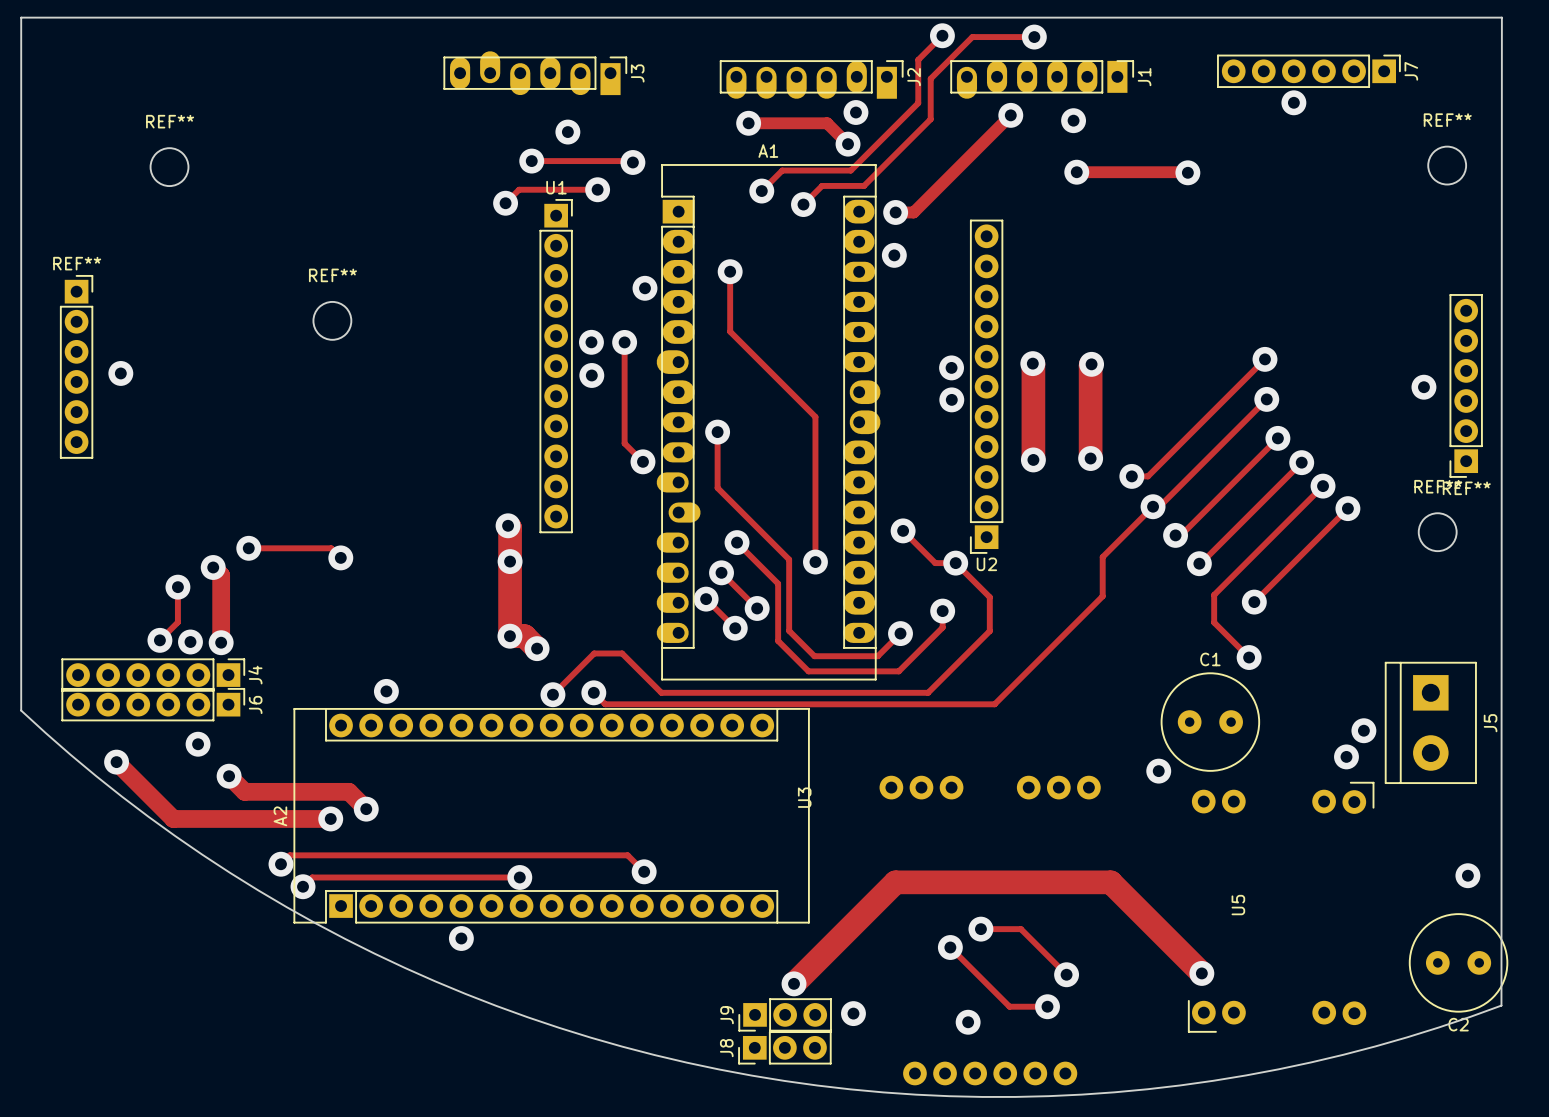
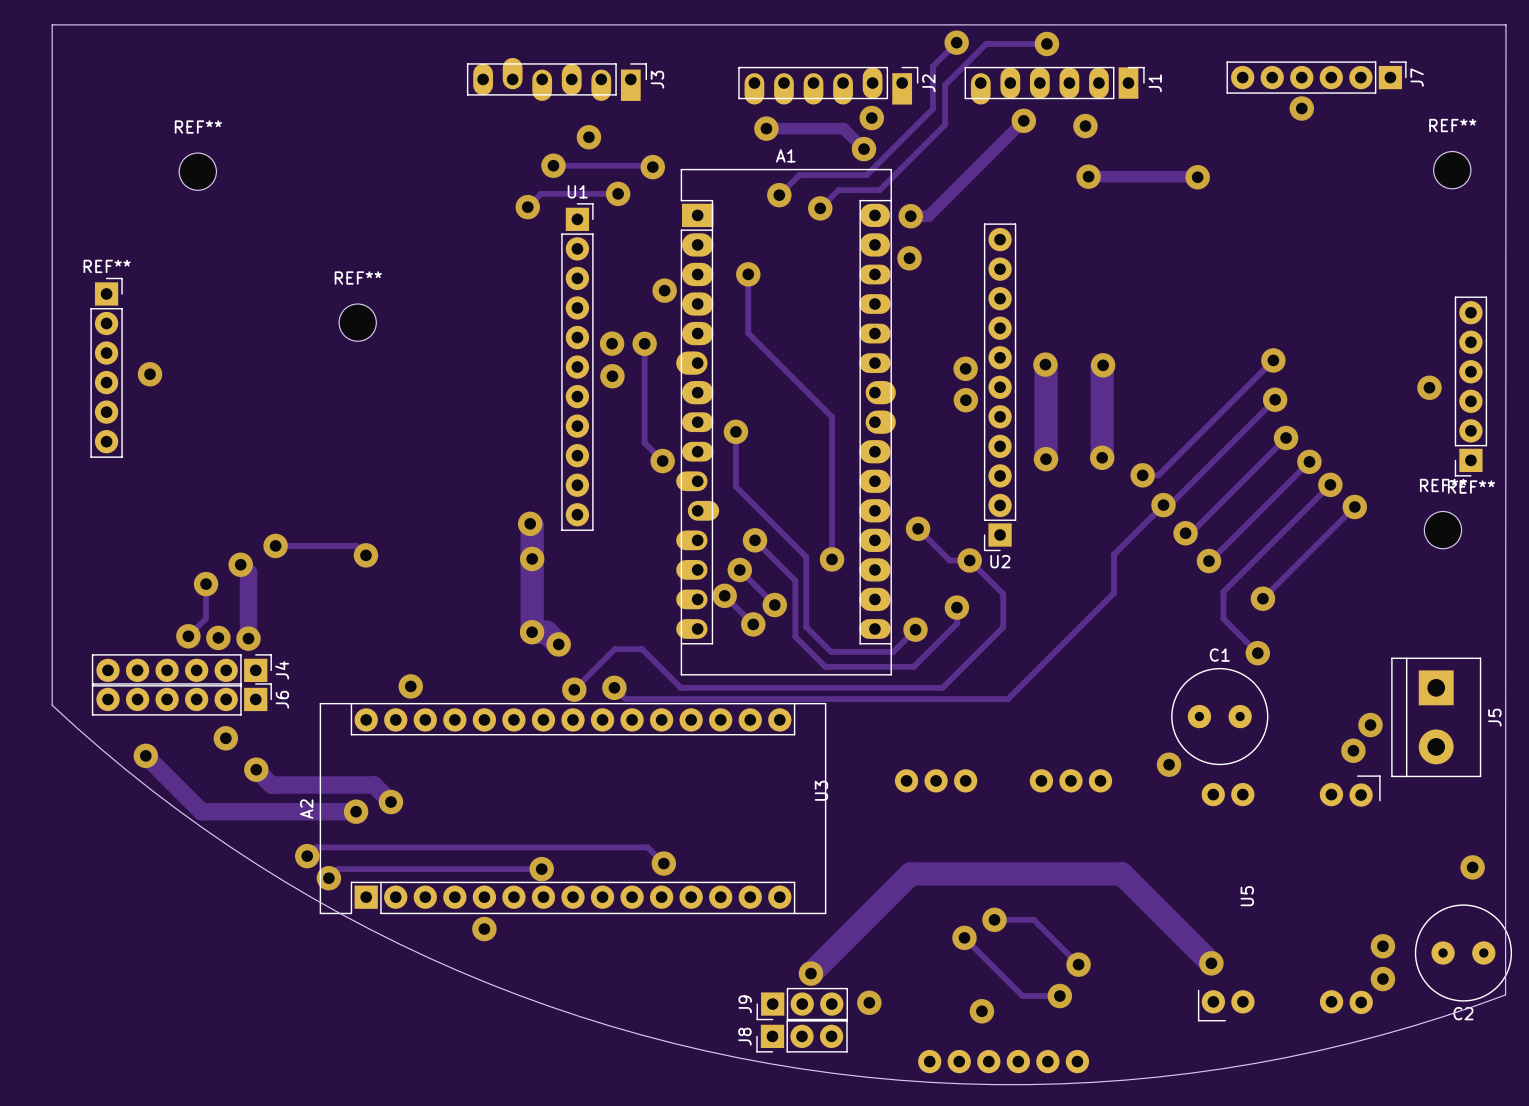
via: none -> (1382, 946)
via: none -> (1382, 979)

